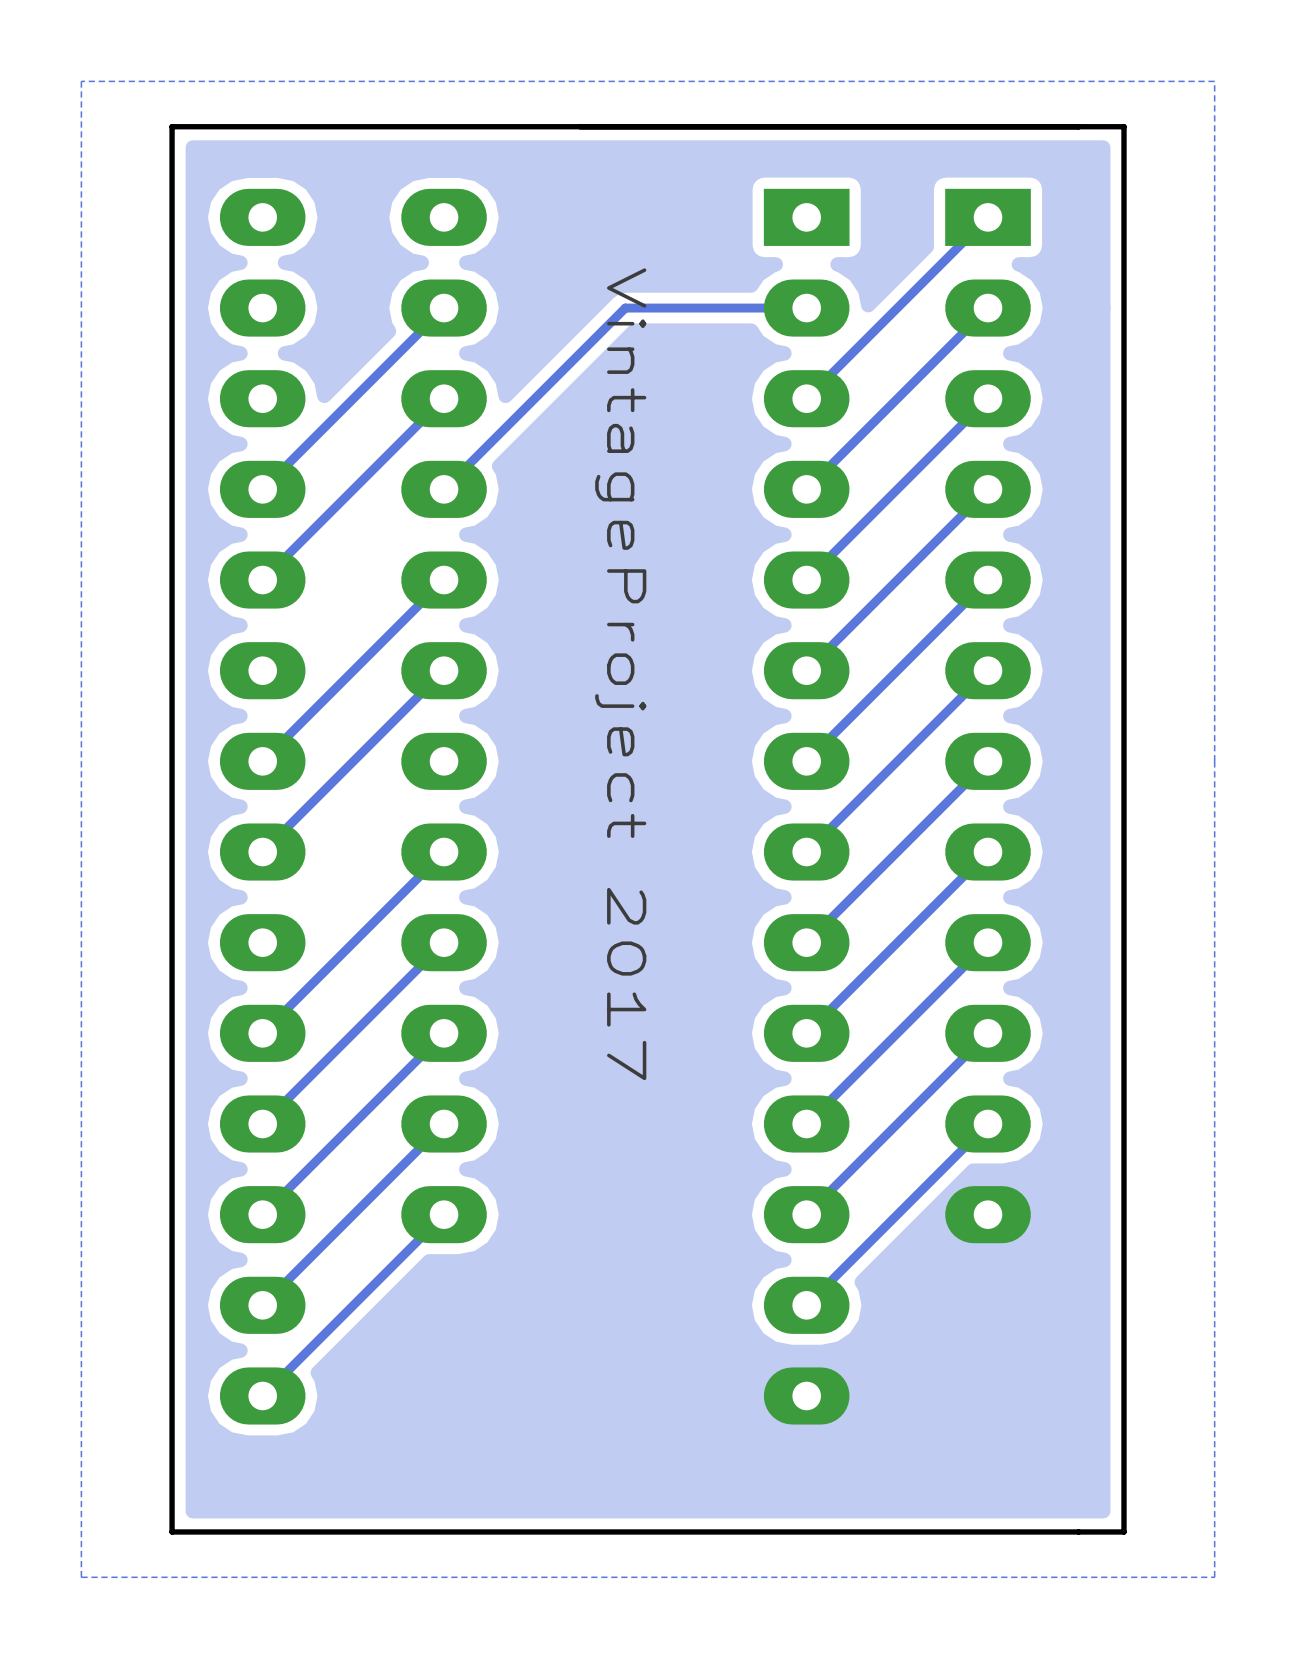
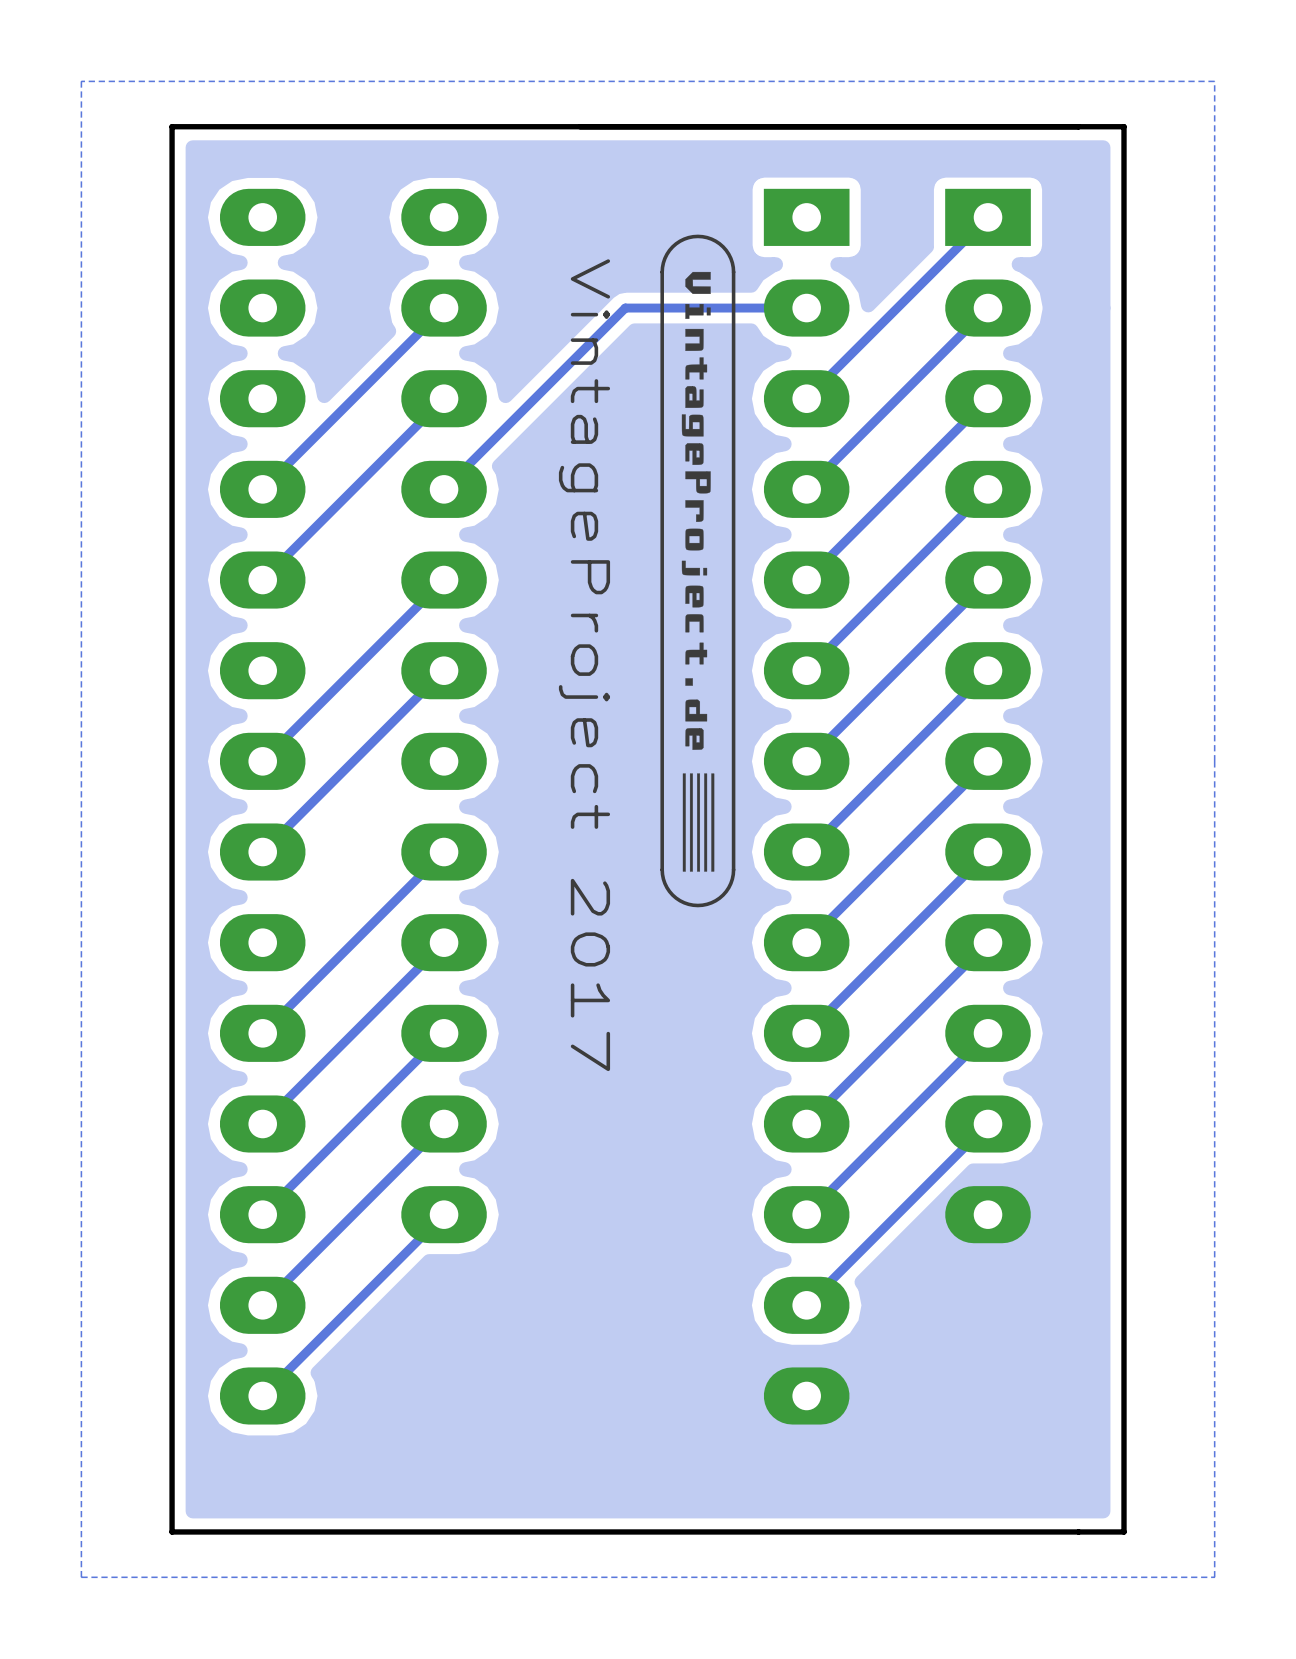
drawing: none -> [660, 234, 736, 908]
text position: VintageProject 2017 (620, 674) -> VintageProject 2017 (584, 665)

